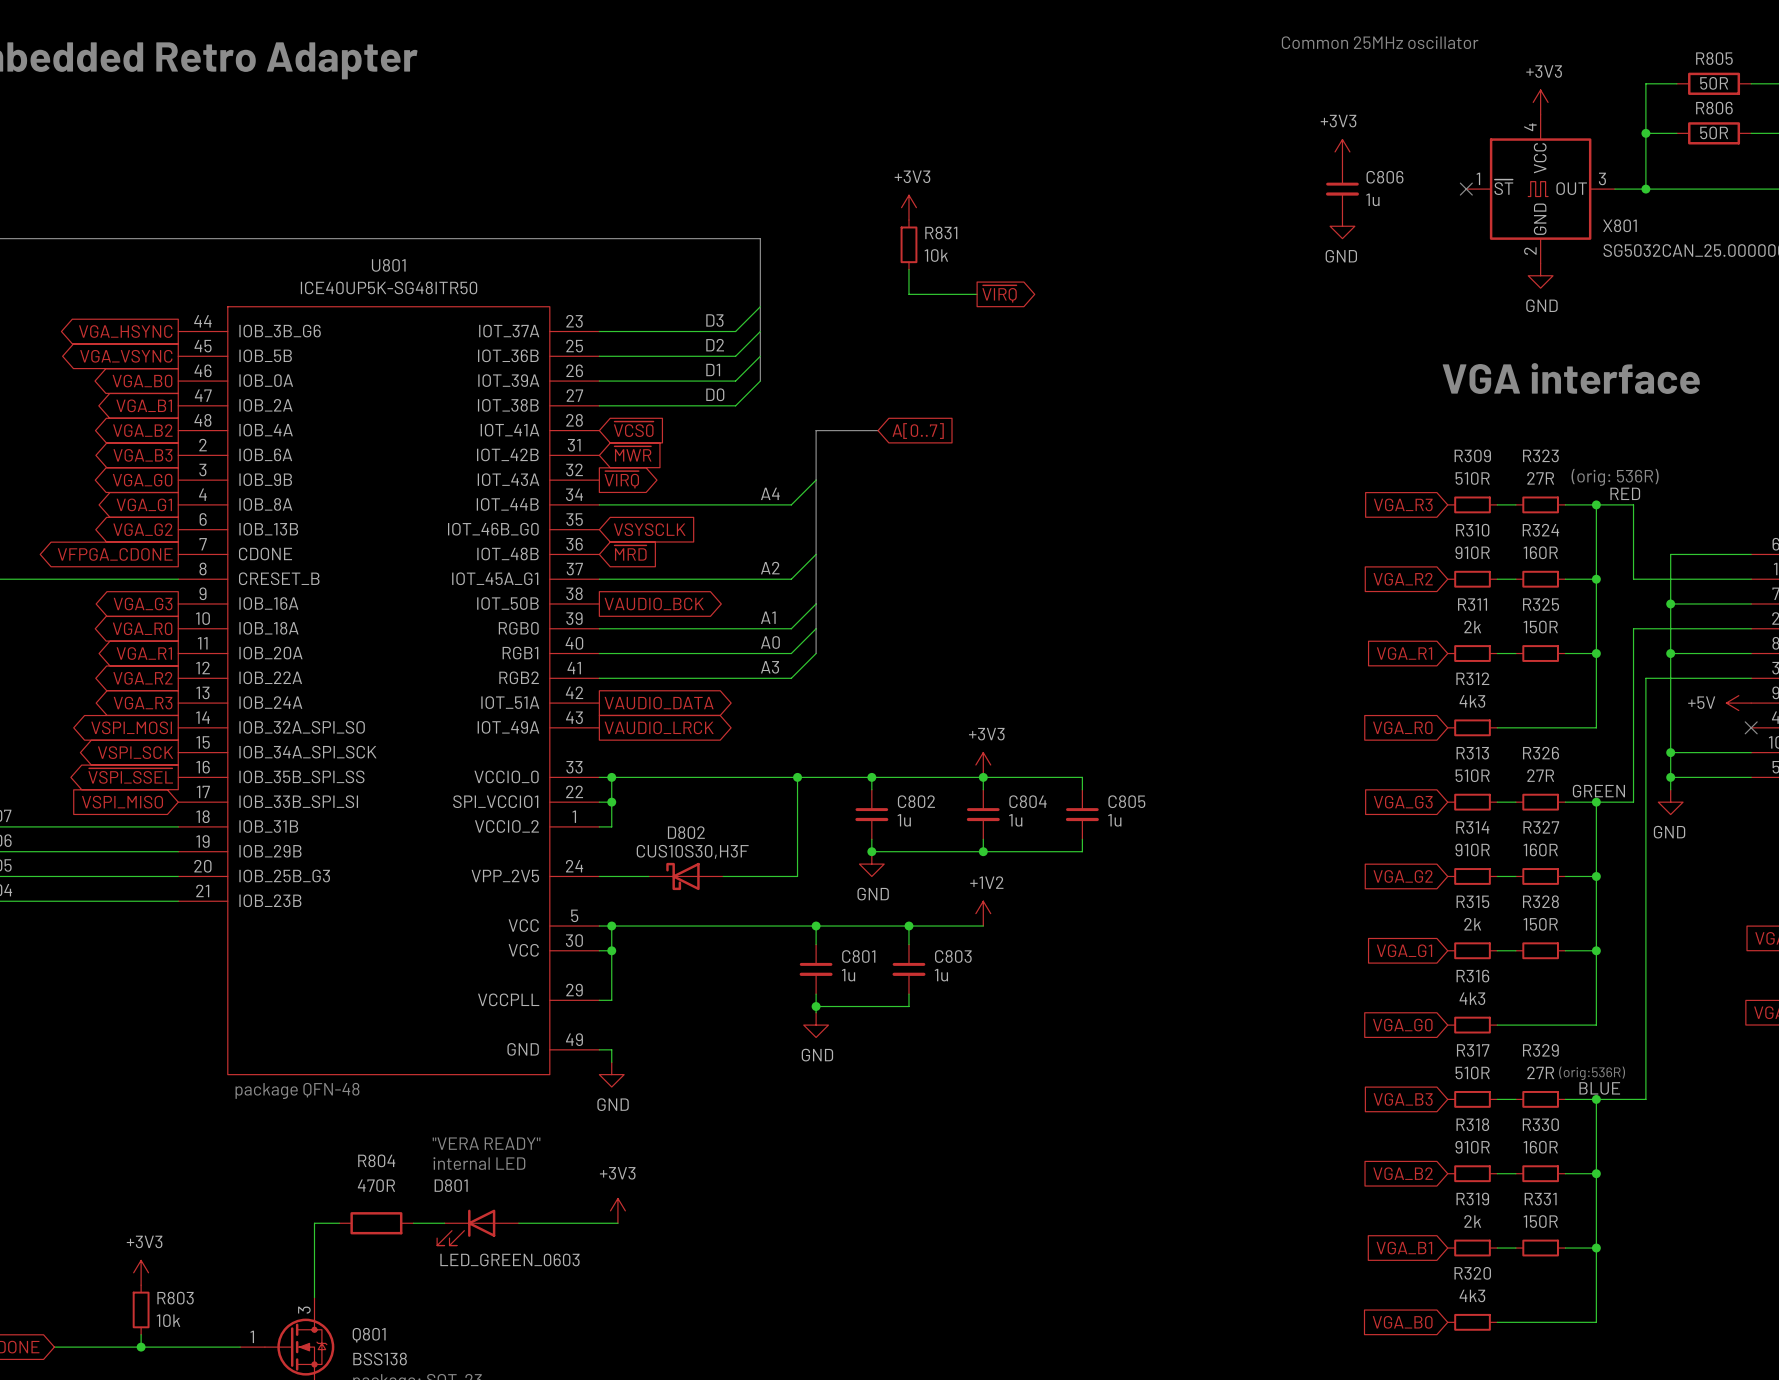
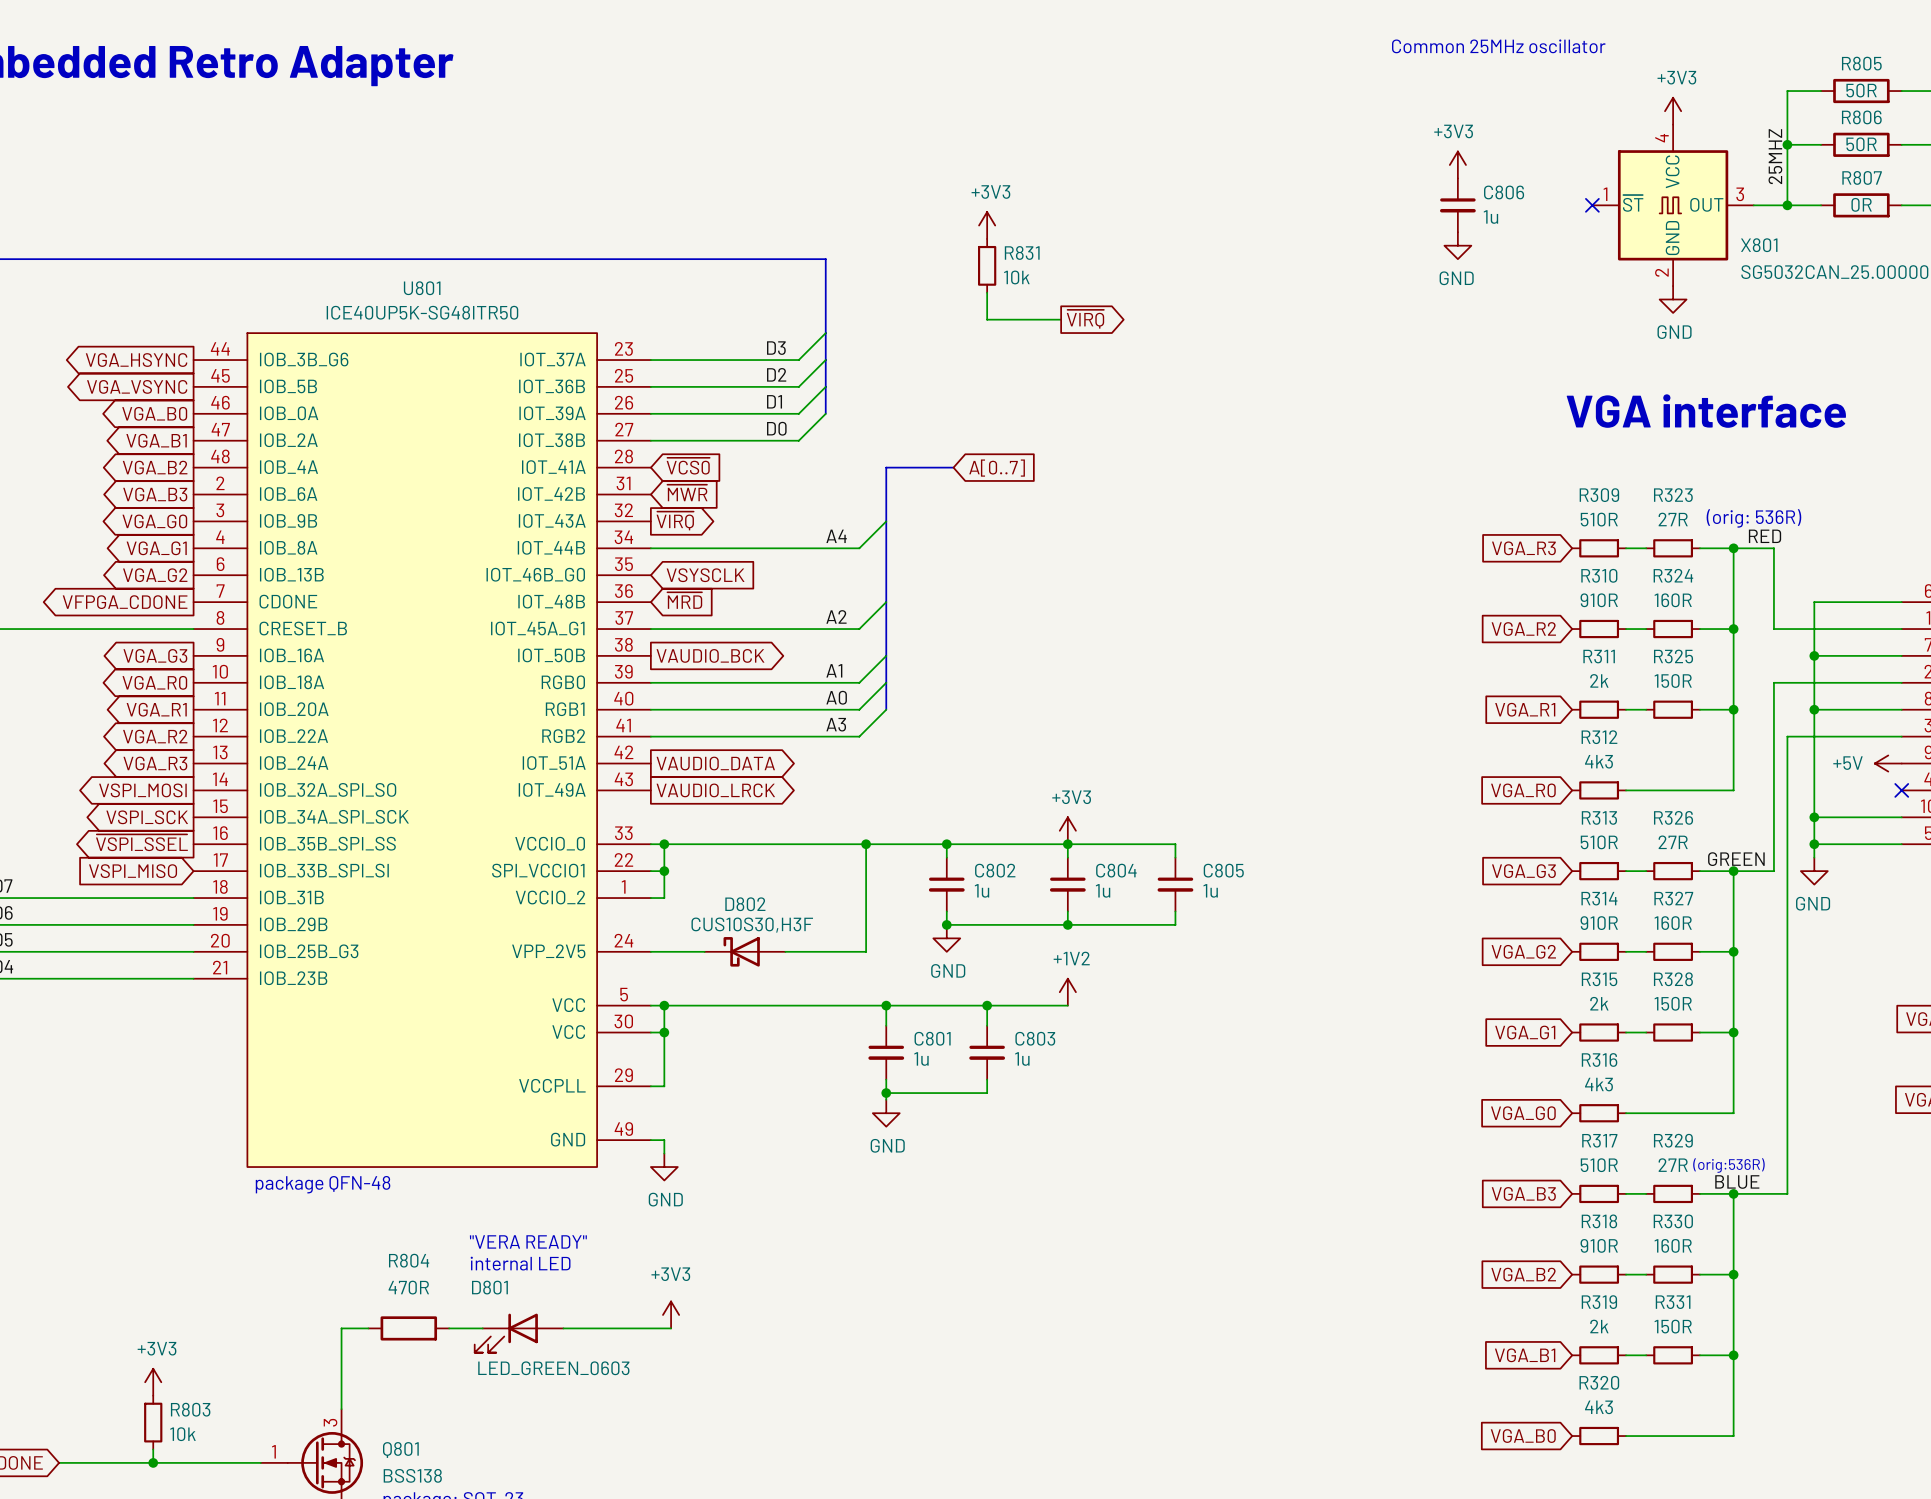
label: none -> 25MHZ (1775, 156)
wire: (1676, 189) (1751, 189) -> none
R807: none -> 0R (1861, 205)

